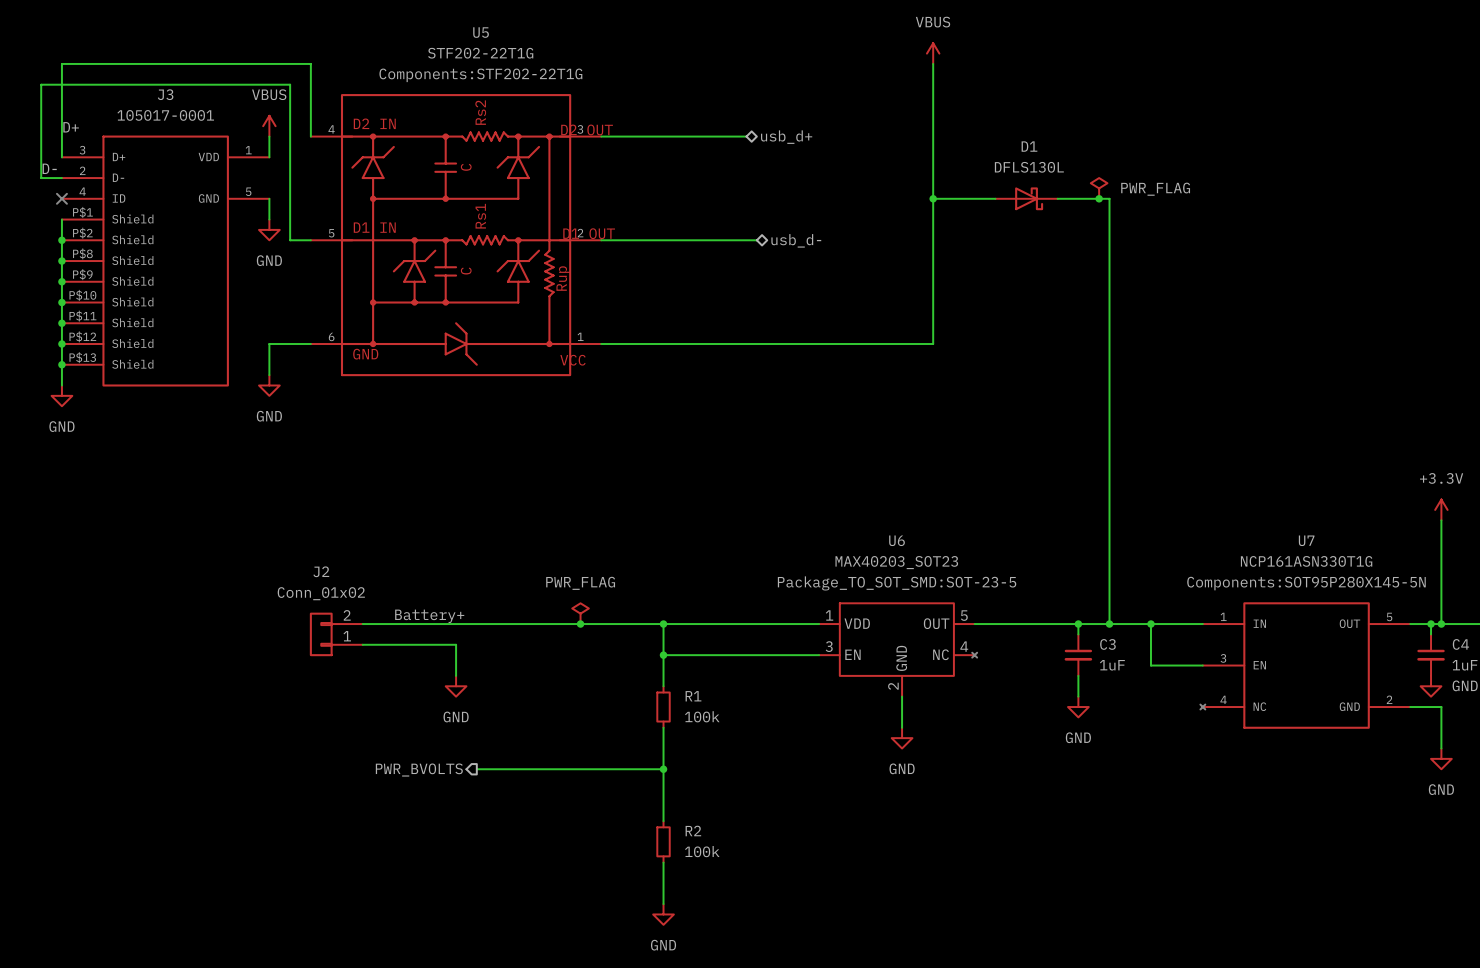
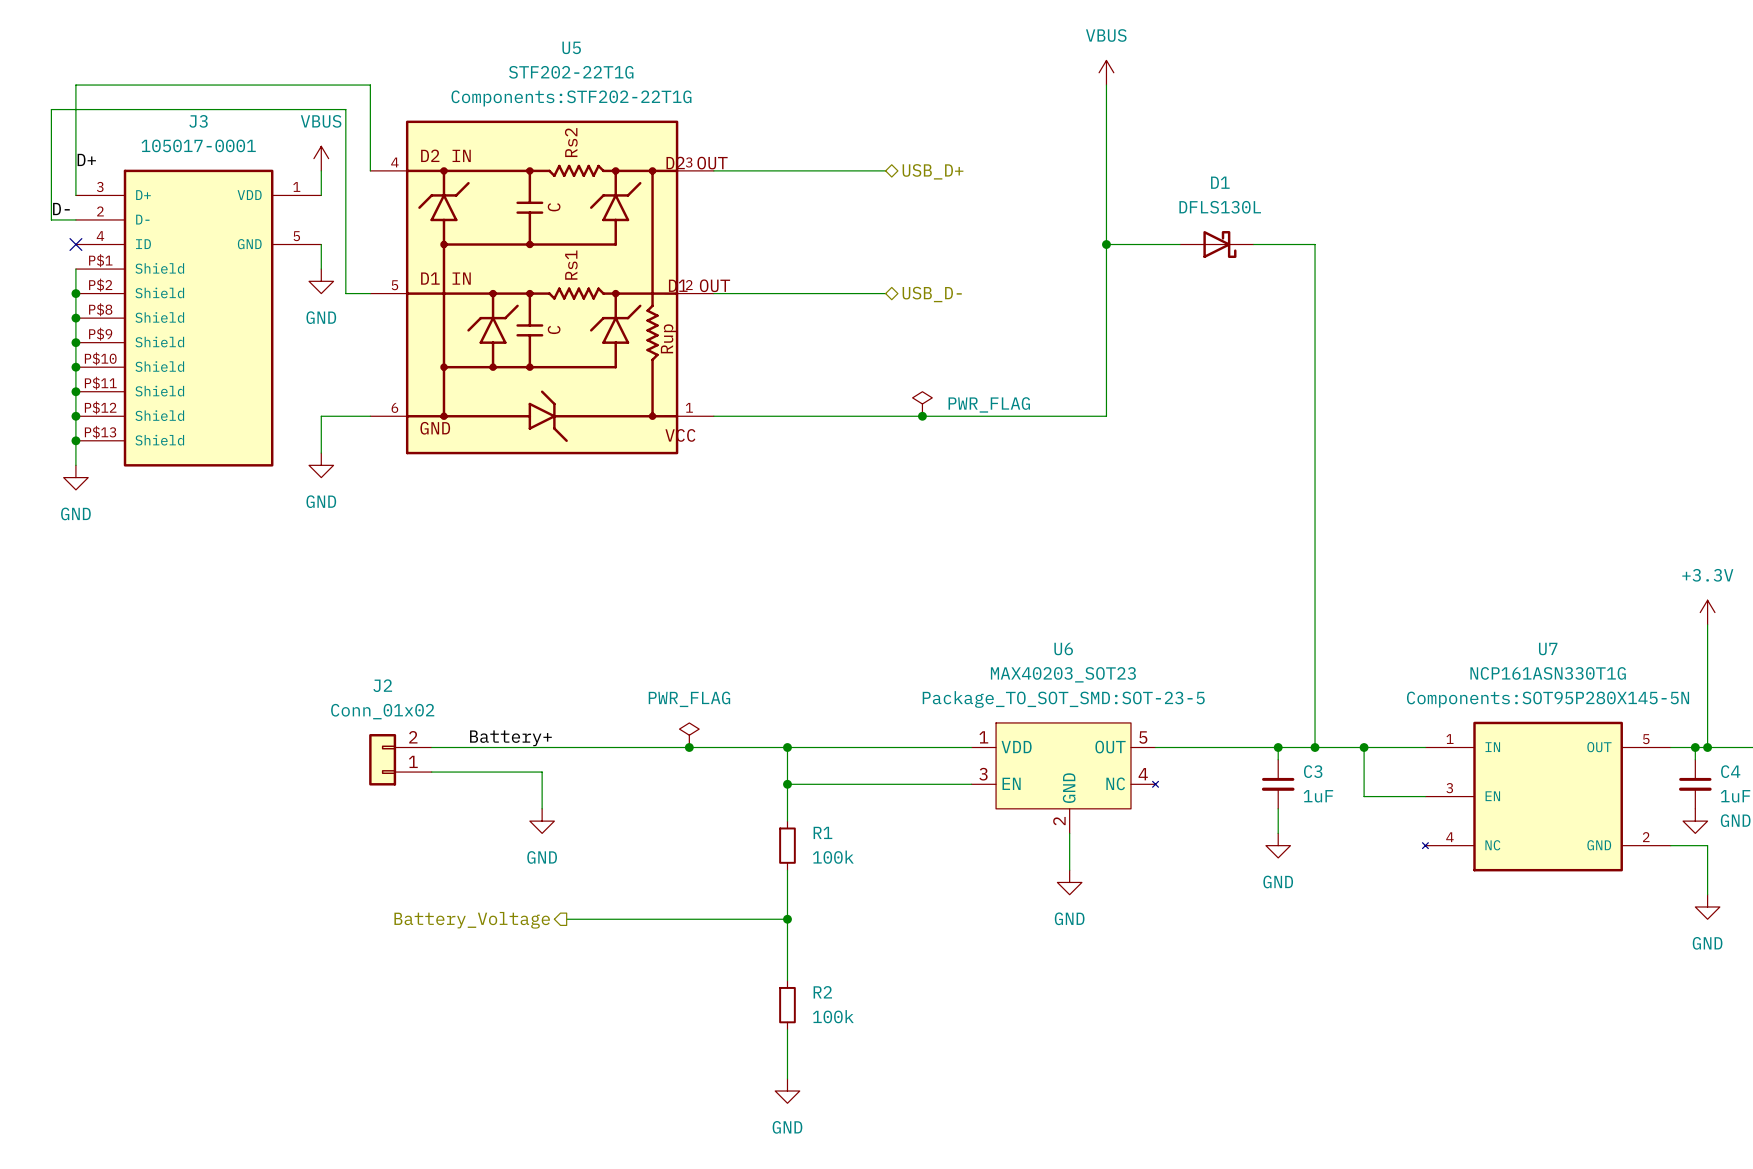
hierarchical label: usb_d+ (786, 137) -> USB_D+ (933, 171)
power symbol: PWR_FLAG (1099, 188) -> none
junction: (1099, 198) -> none
wire: (746, 240) (756, 240) -> none
hierarchical label: usb_d- (796, 240) -> none
hierarchical label: none -> USB_D- (932, 294)
power symbol: none -> PWR_FLAG (922, 403)
junction: none -> (922, 416)
hierarchical label: PWR_BVOLTS (419, 770) -> Battery_Voltage (472, 920)

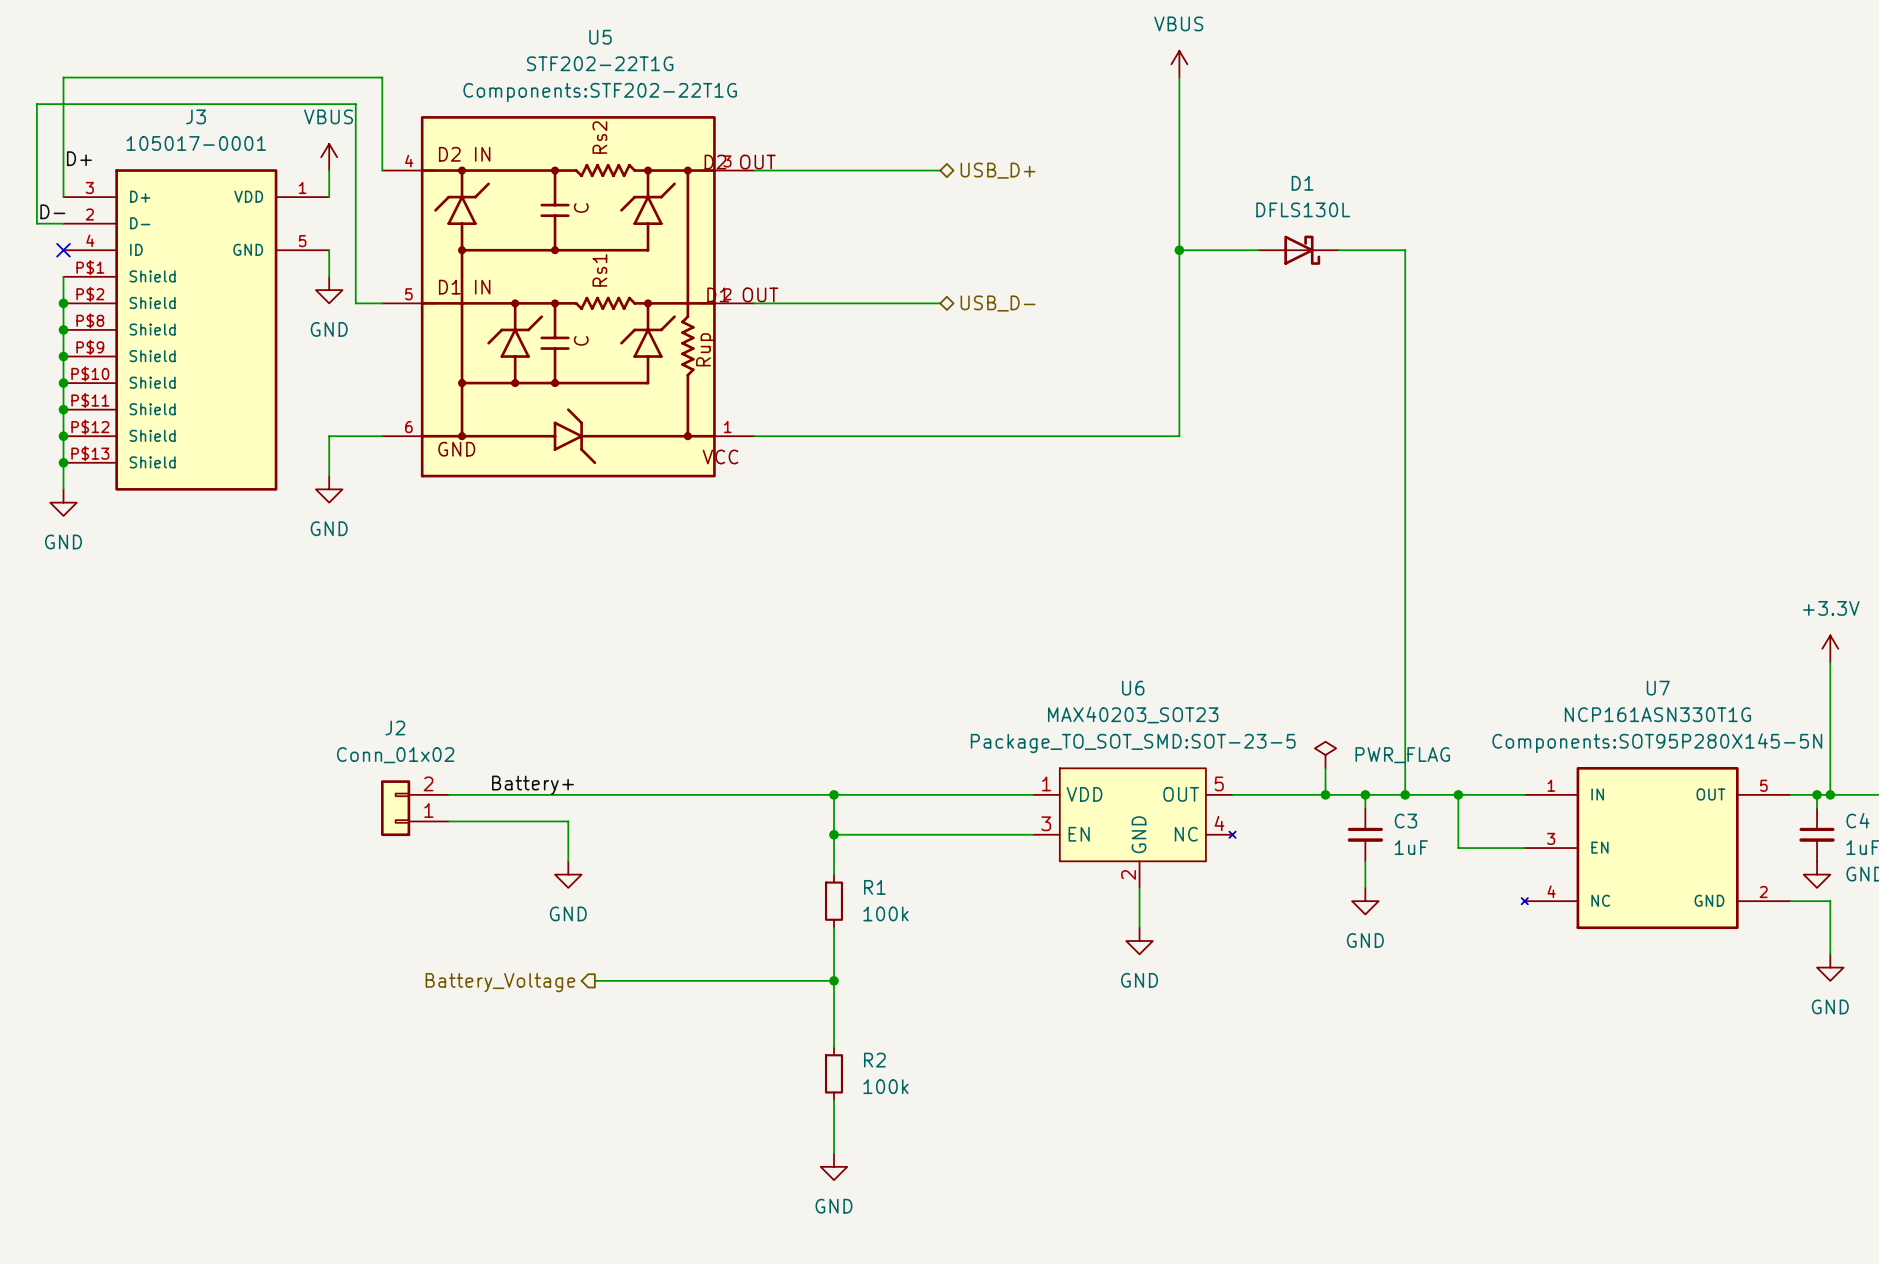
power symbol: PWR_FLAG (922, 403) -> none
junction: (922, 416) -> none
power symbol: none -> PWR_FLAG (1325, 755)
wire: none -> (1325, 768) (1325, 794)
power symbol: PWR_FLAG (689, 735) -> none
junction: (689, 747) -> none
junction: none -> (1325, 794)

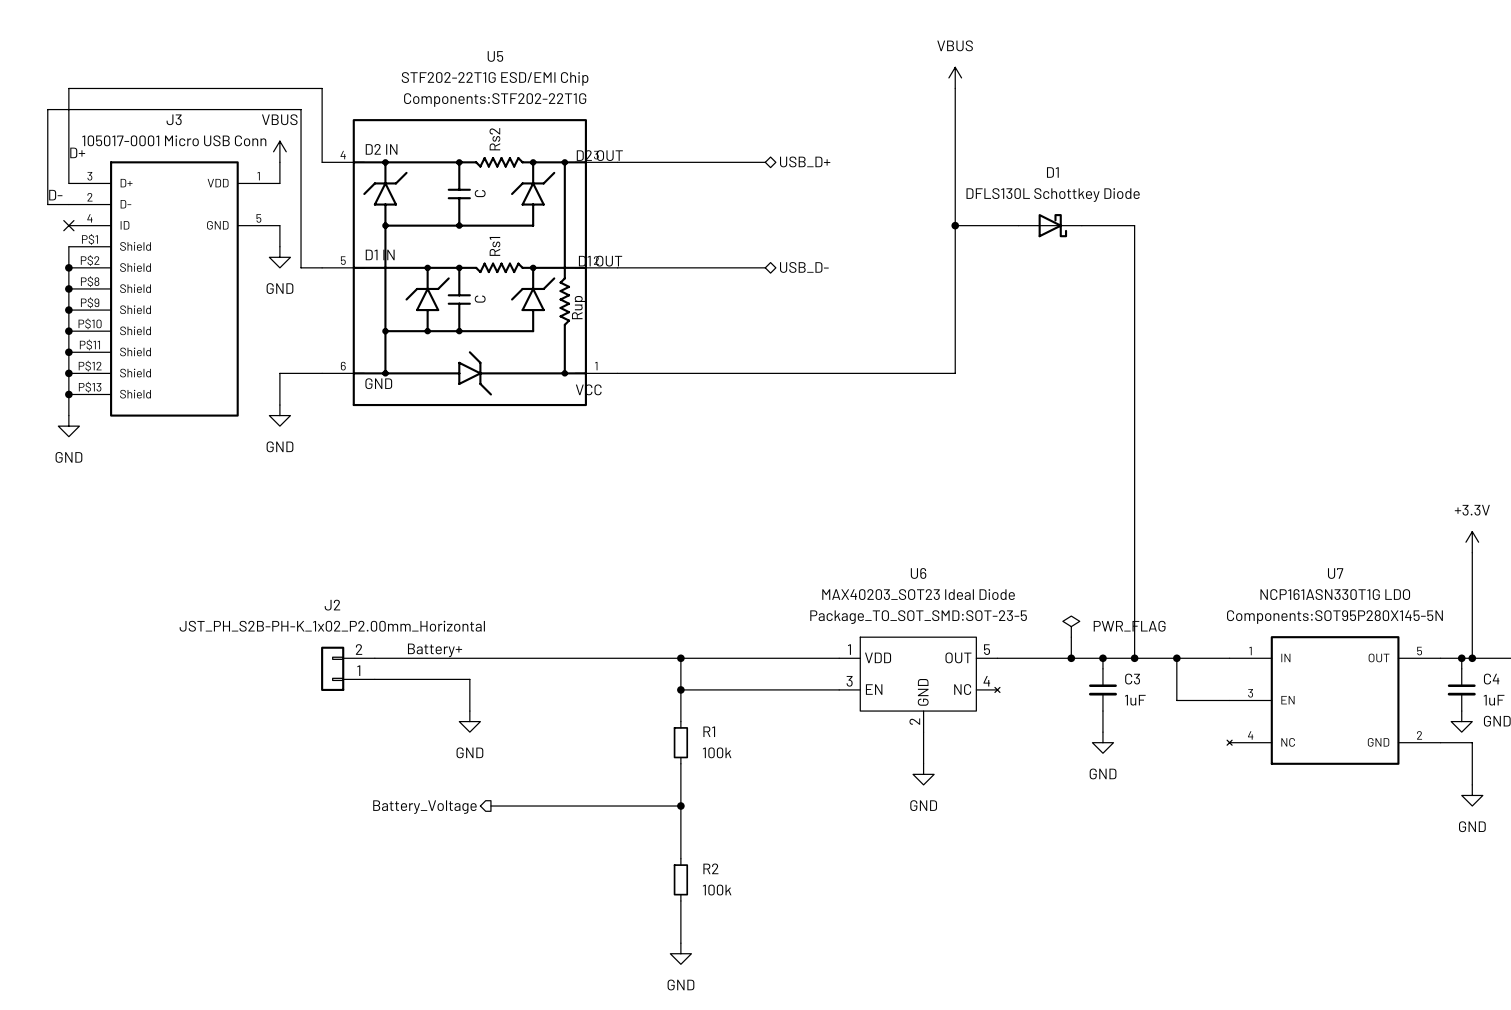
U5 value: STF202-22T1G (600, 63) -> STF202-22T1G ESD/EMI Chip (495, 78)
J3 value: 105017-0001 (196, 143) -> 105017-0001 Micro USB Conn (174, 140)
D1 value: DFLS130L (1303, 209) -> DFLS130L Schottkey Diode (1053, 195)
U7 value: NCP161ASN330T1G (1657, 714) -> NCP161ASN330T1G LDO (1335, 594)
U6 value: MAX40203_SOT23 (1133, 715) -> MAX40203_SOT23 Ideal Diode (918, 594)
J2 value: Conn_01x02 (395, 755) -> JST_PH_S2B-PH-K_1x02_P2.00mm_Horizontal (332, 626)

